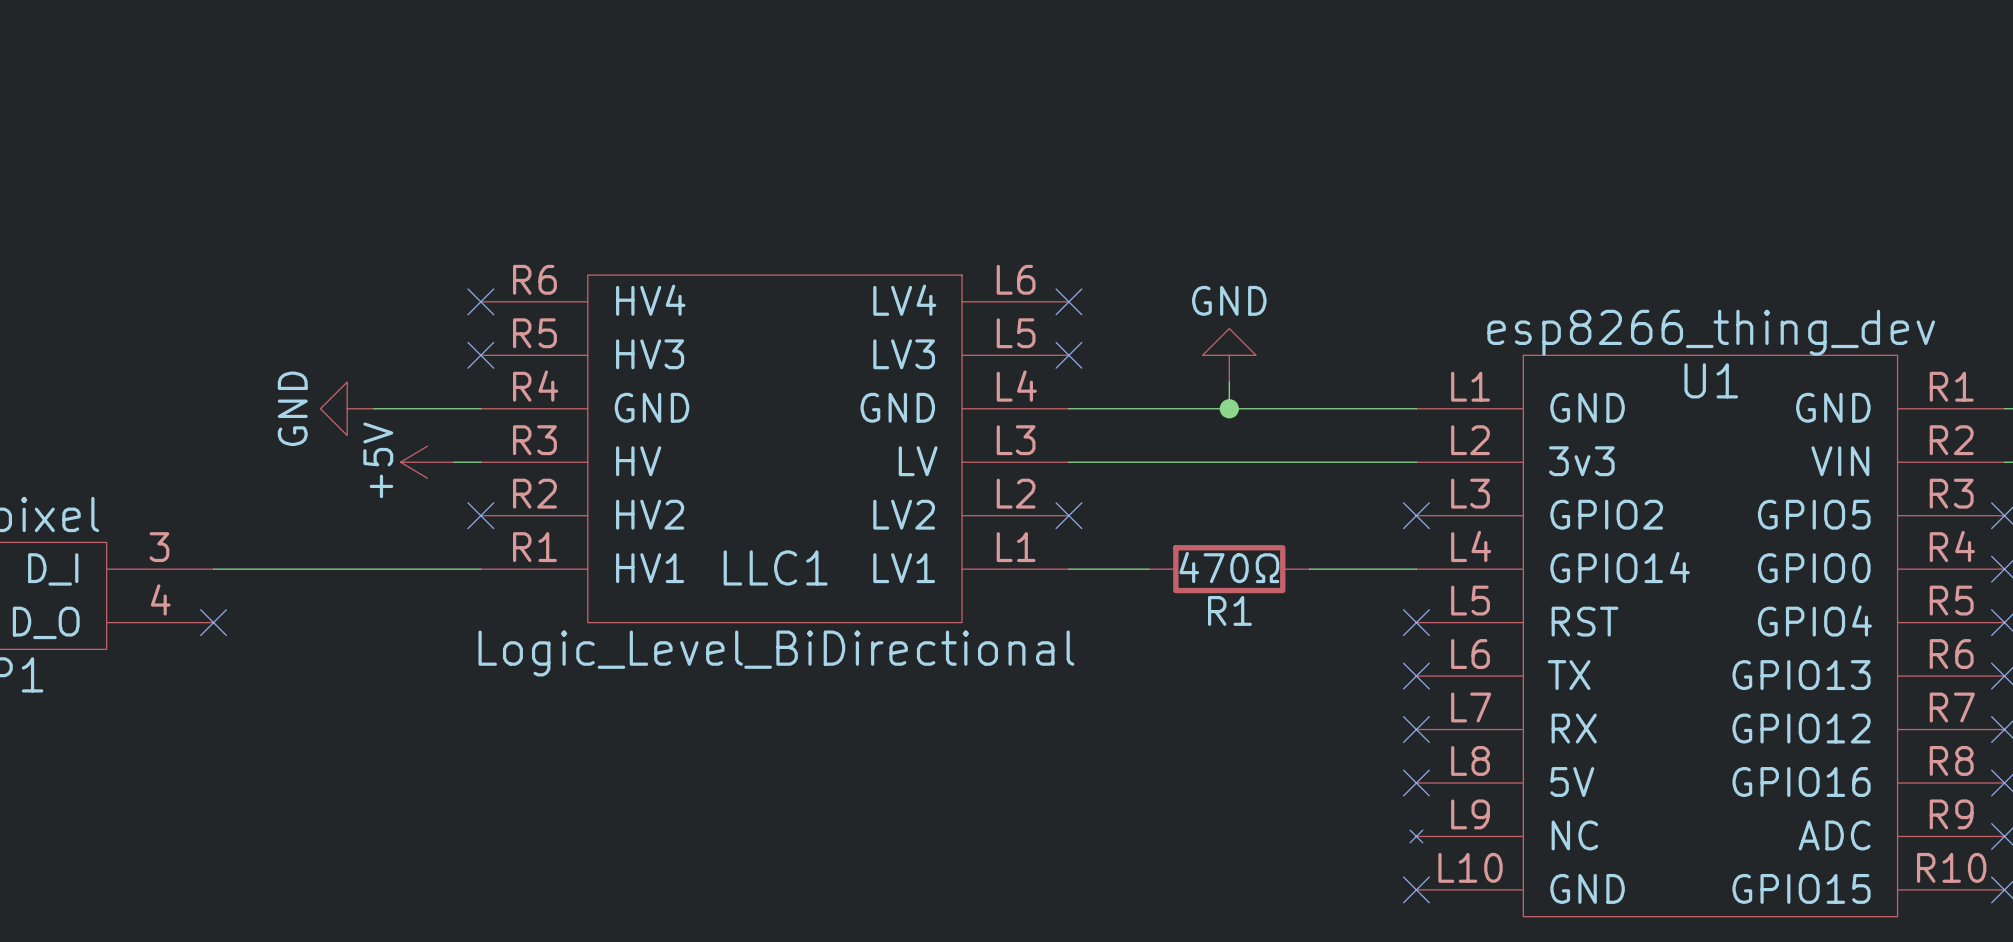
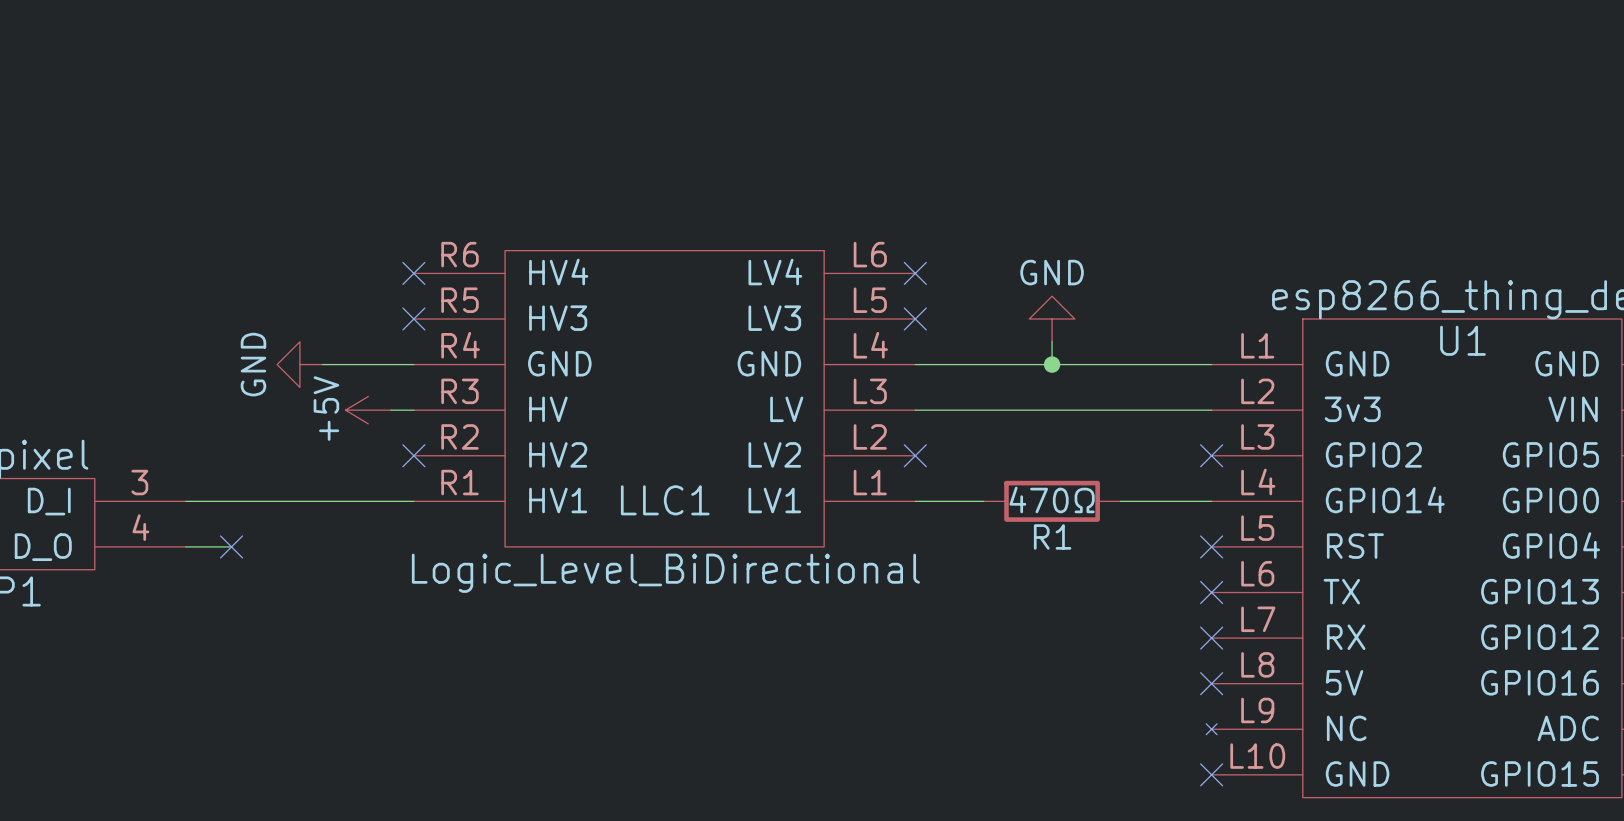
wire: none -> (185, 546) (231, 546)
no-connect mark position: (213, 622) -> (231, 546)

